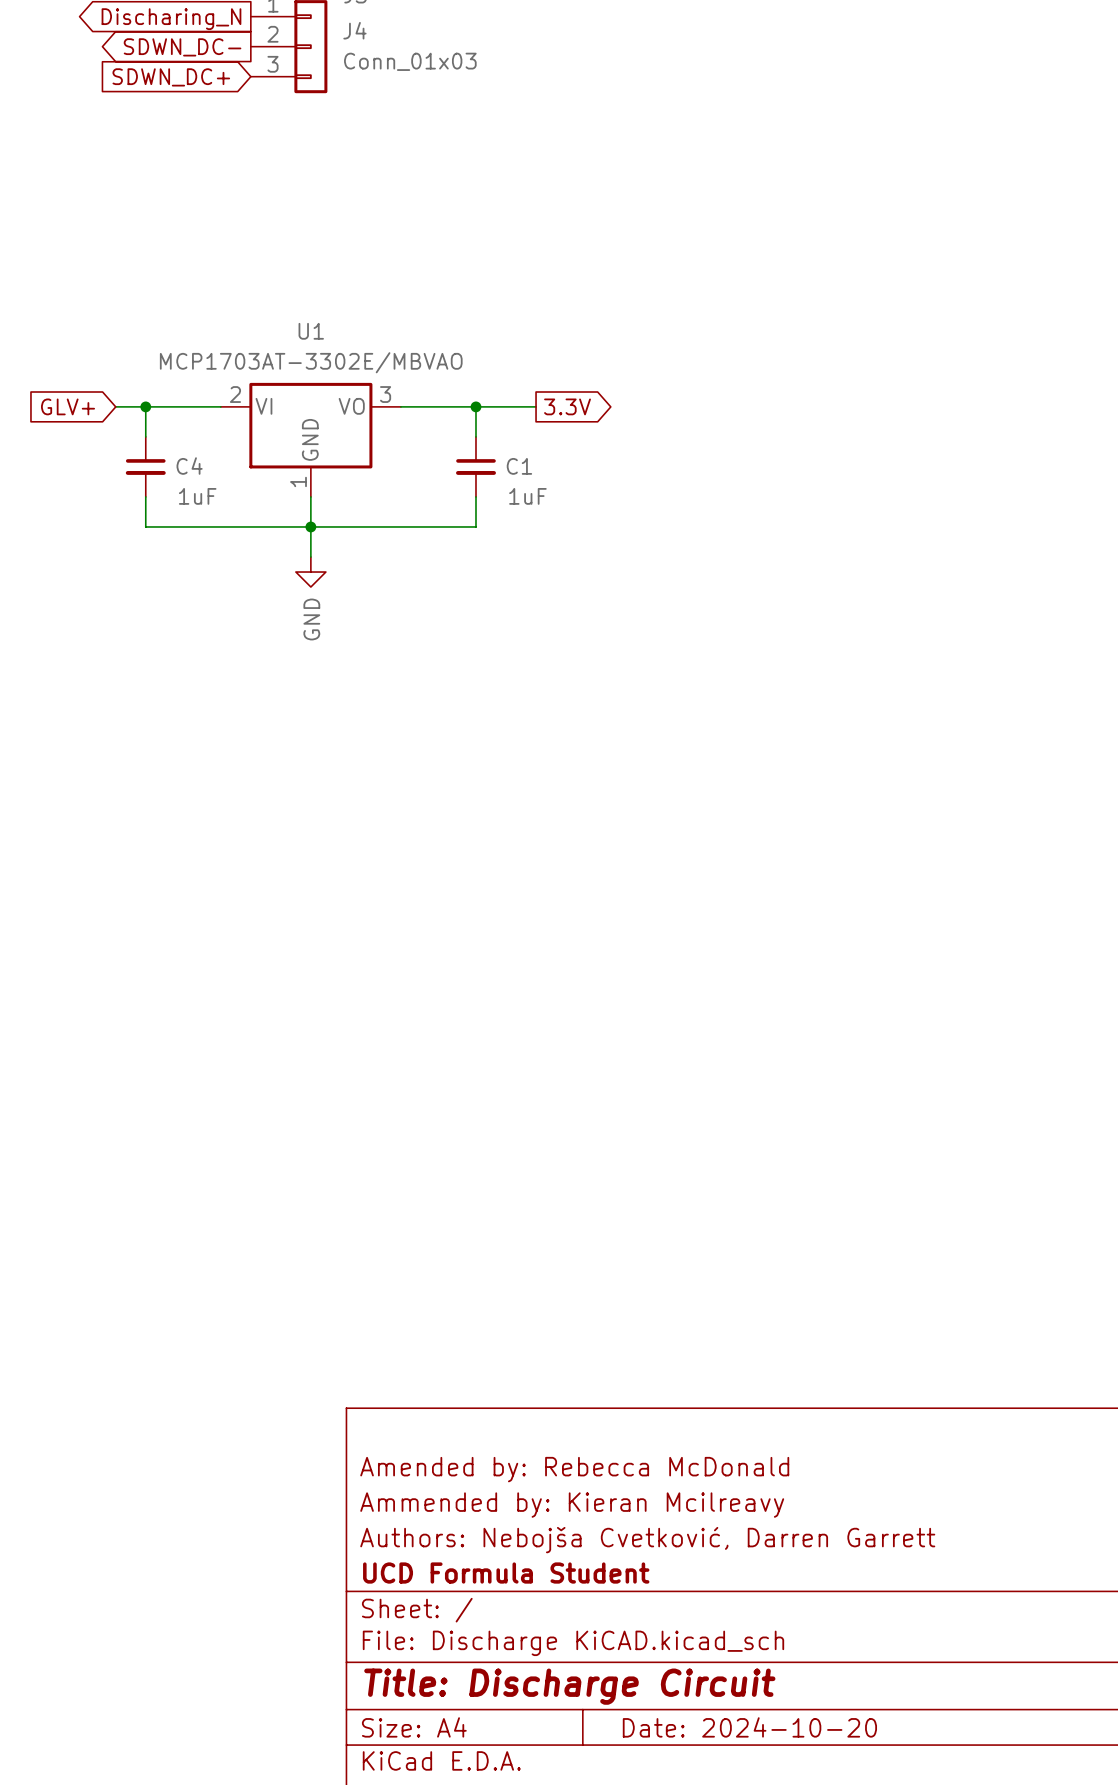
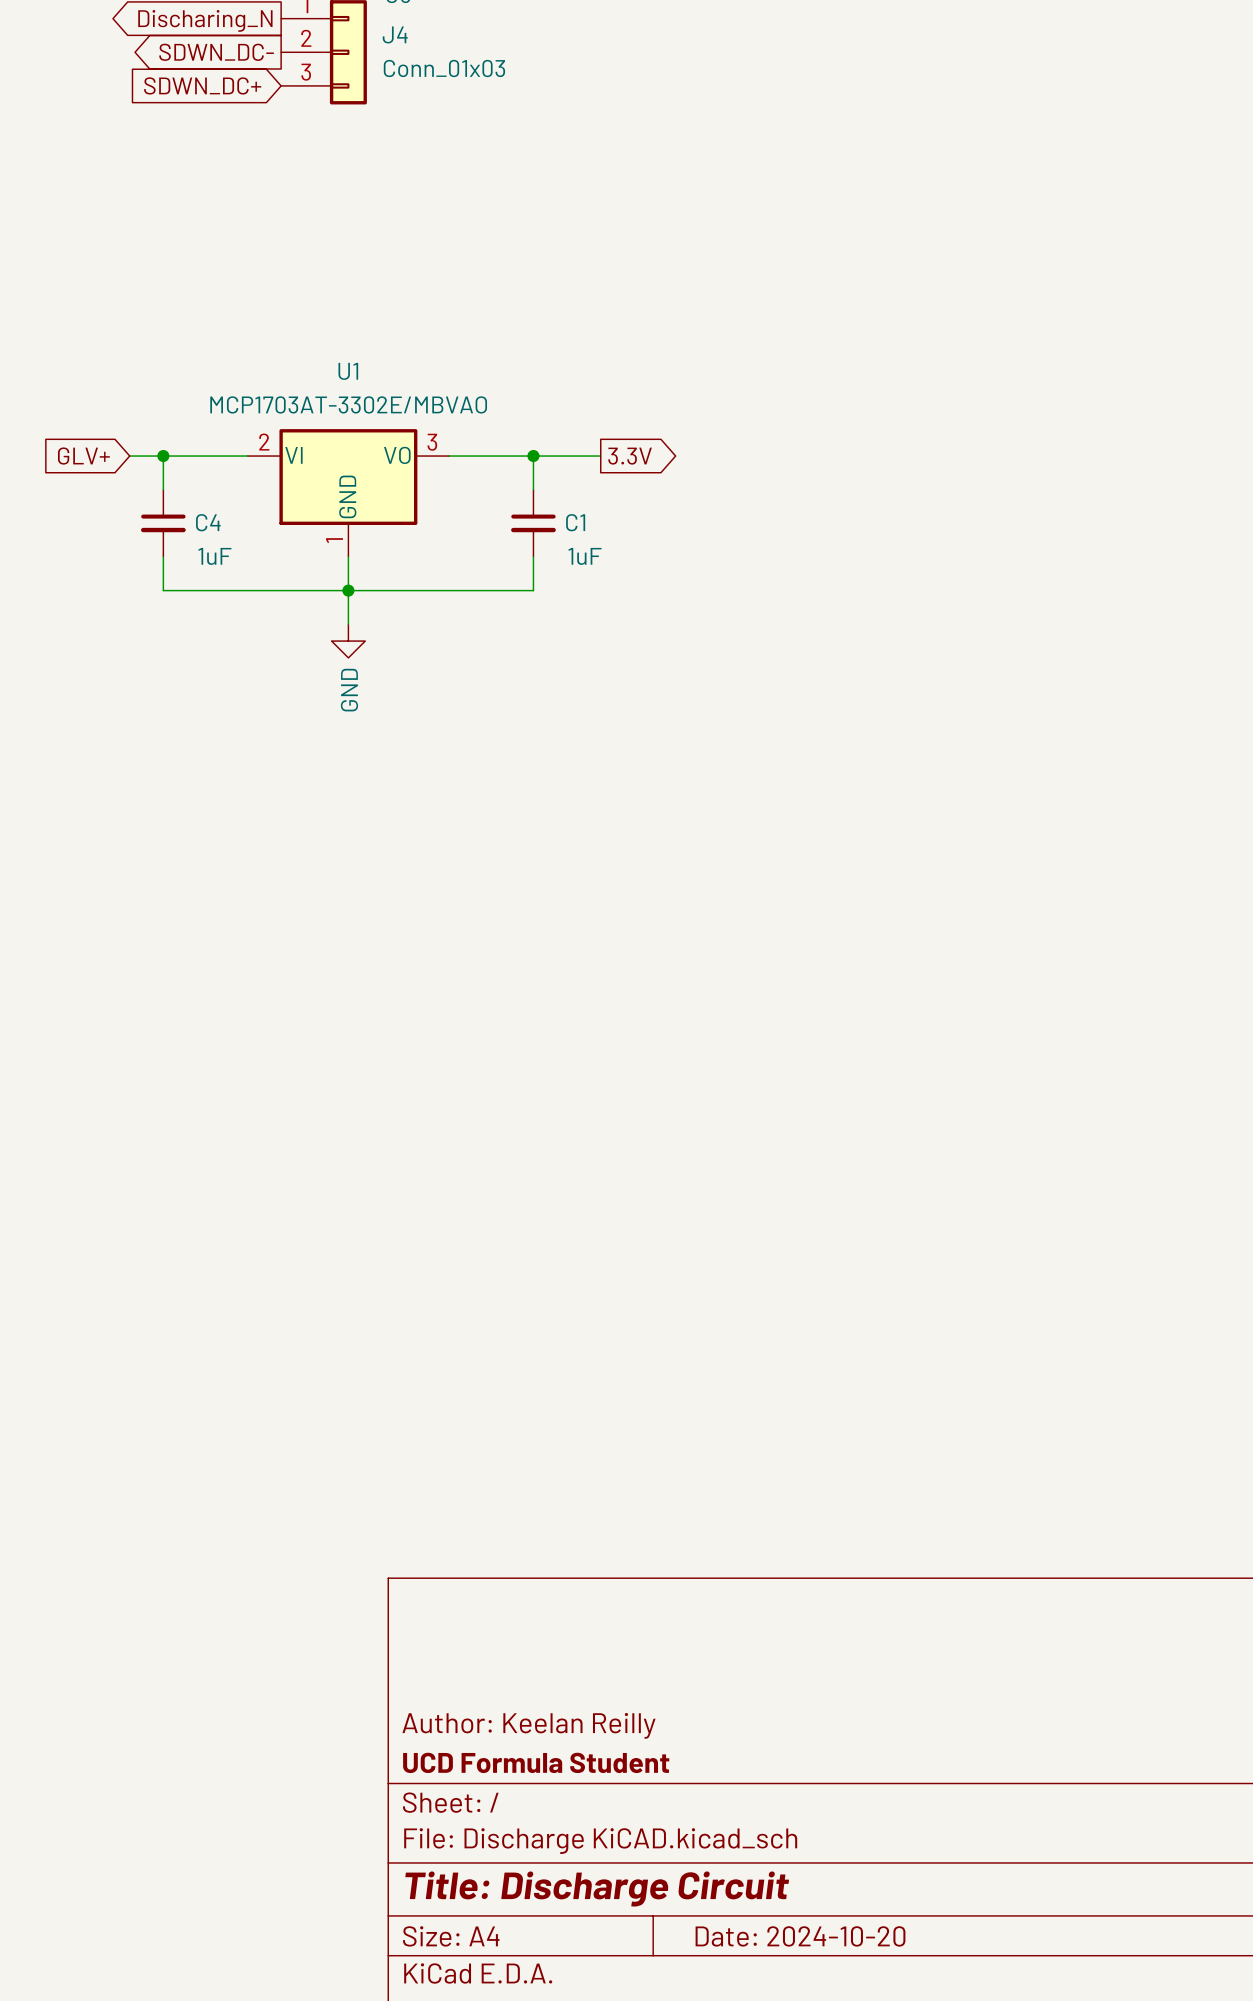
title block: Amended by: Rebecca McDonald (574, 1469) -> none
title block: Ammended by: Kieran Mcilreavy (572, 1505) -> none
title block: Authors: Nebojša Cvetković, Darren Garrett (647, 1540) -> Author: Keelan Reilly (528, 1725)

